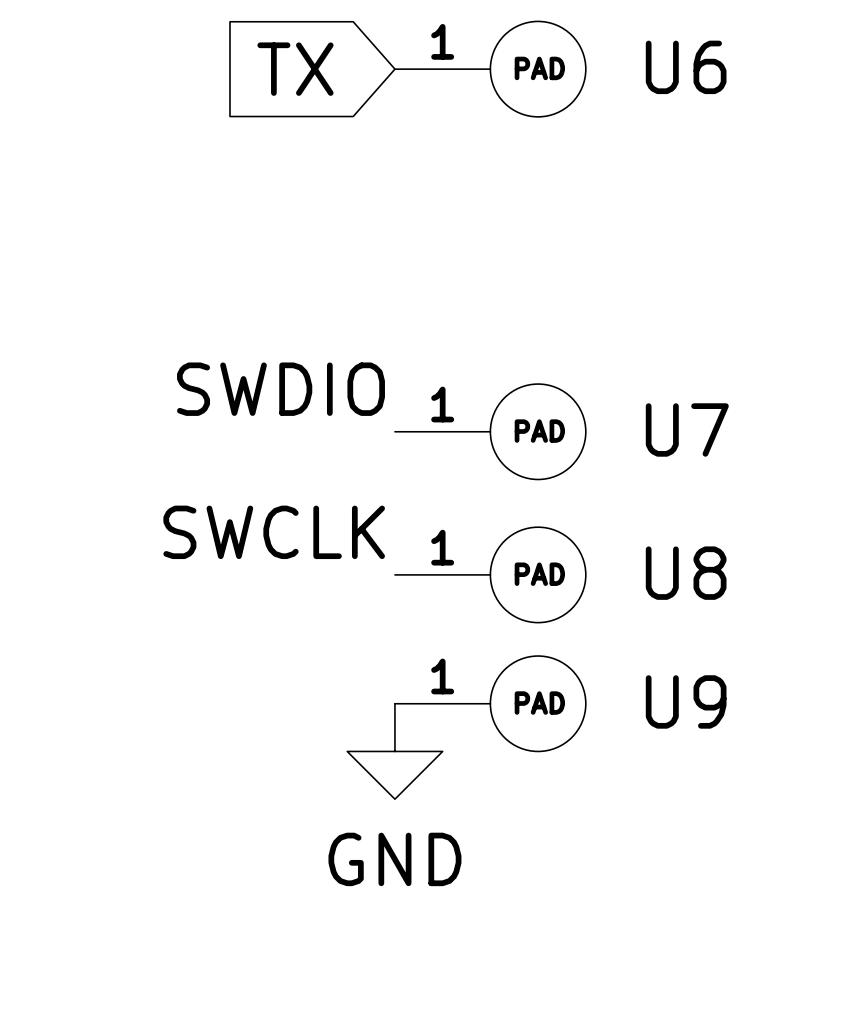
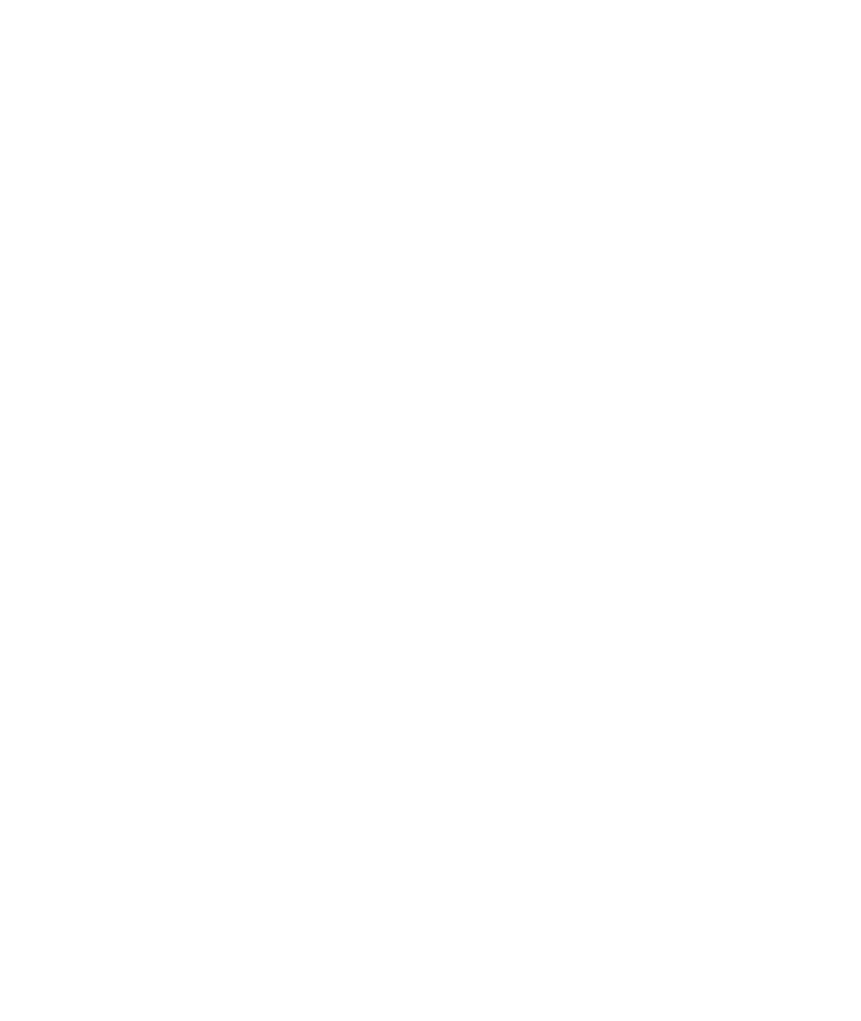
global label: TX (295, 69) -> none
U6: (490, 69) -> none
label: SWDIO (280, 389) -> none
U7: (490, 431) -> none
label: SWCLK (274, 532) -> none
U8: (490, 574) -> none
U9: (490, 703) -> none
power symbol: GND (394, 751) -> none

